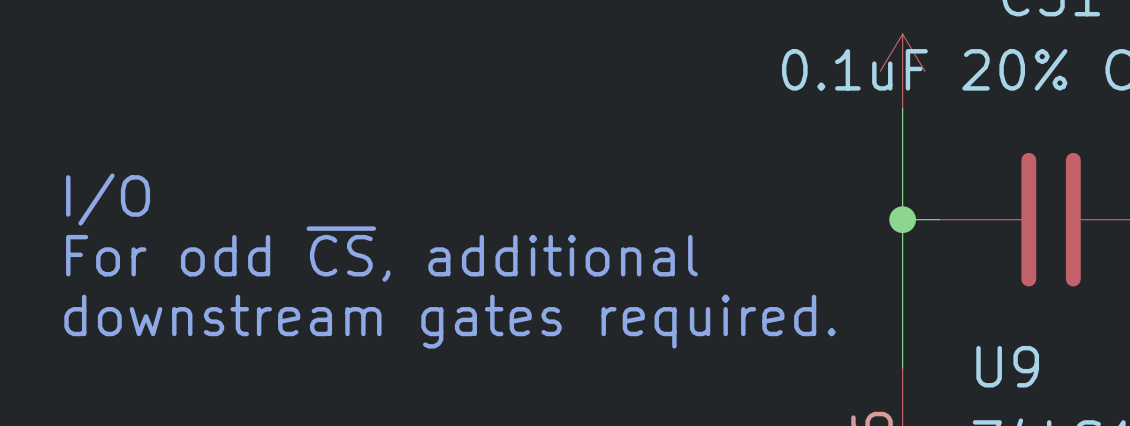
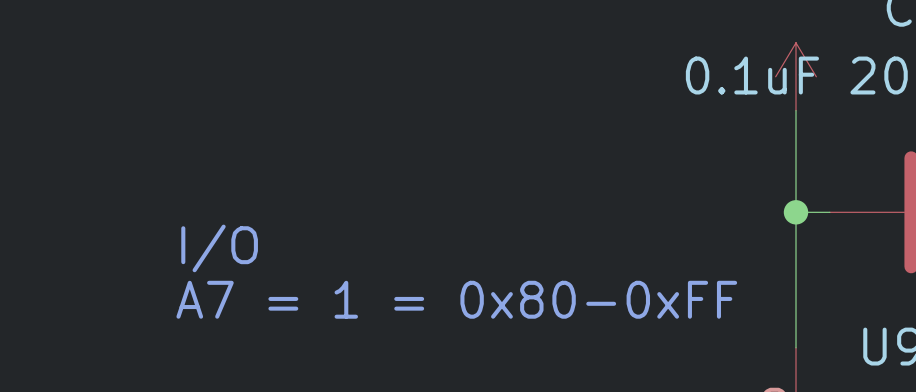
text position: I/O (108, 199) -> I/O (219, 248)
text: For odd ~{CS}, additional (381, 254) -> none
text: none -> A7 = 1 = 0x80-0xFF (456, 299)
text: downstream gates required. (449, 321) -> none

